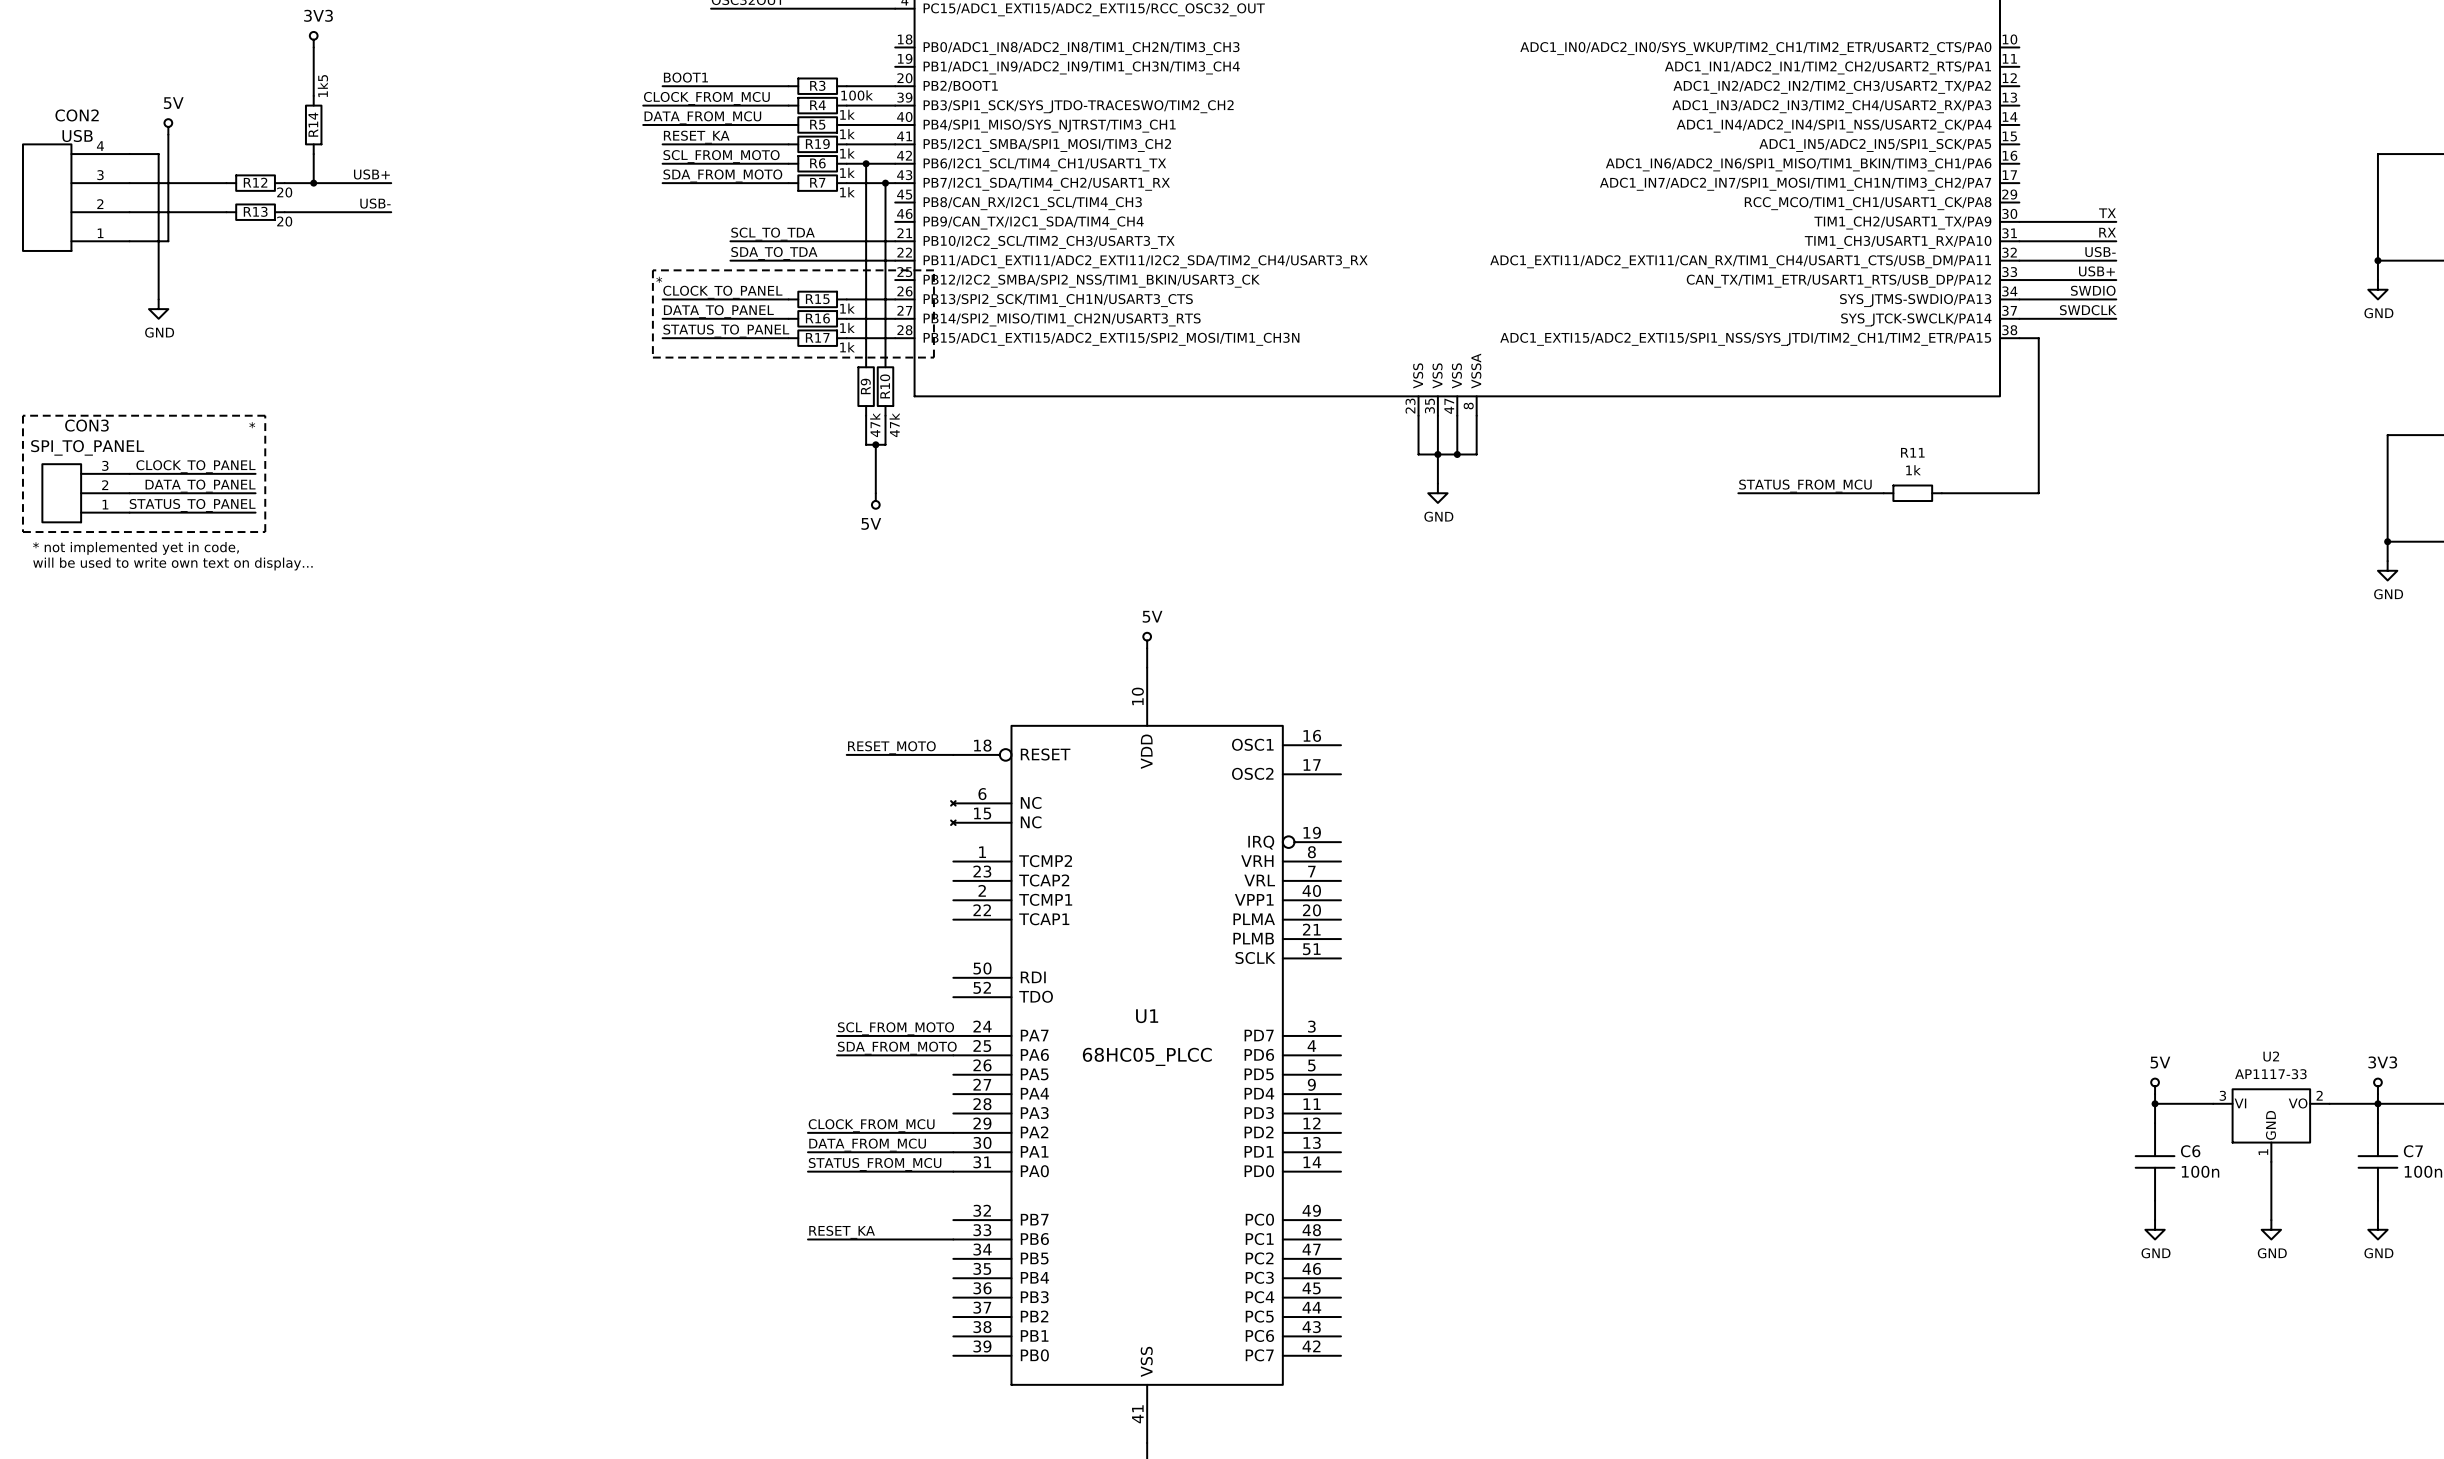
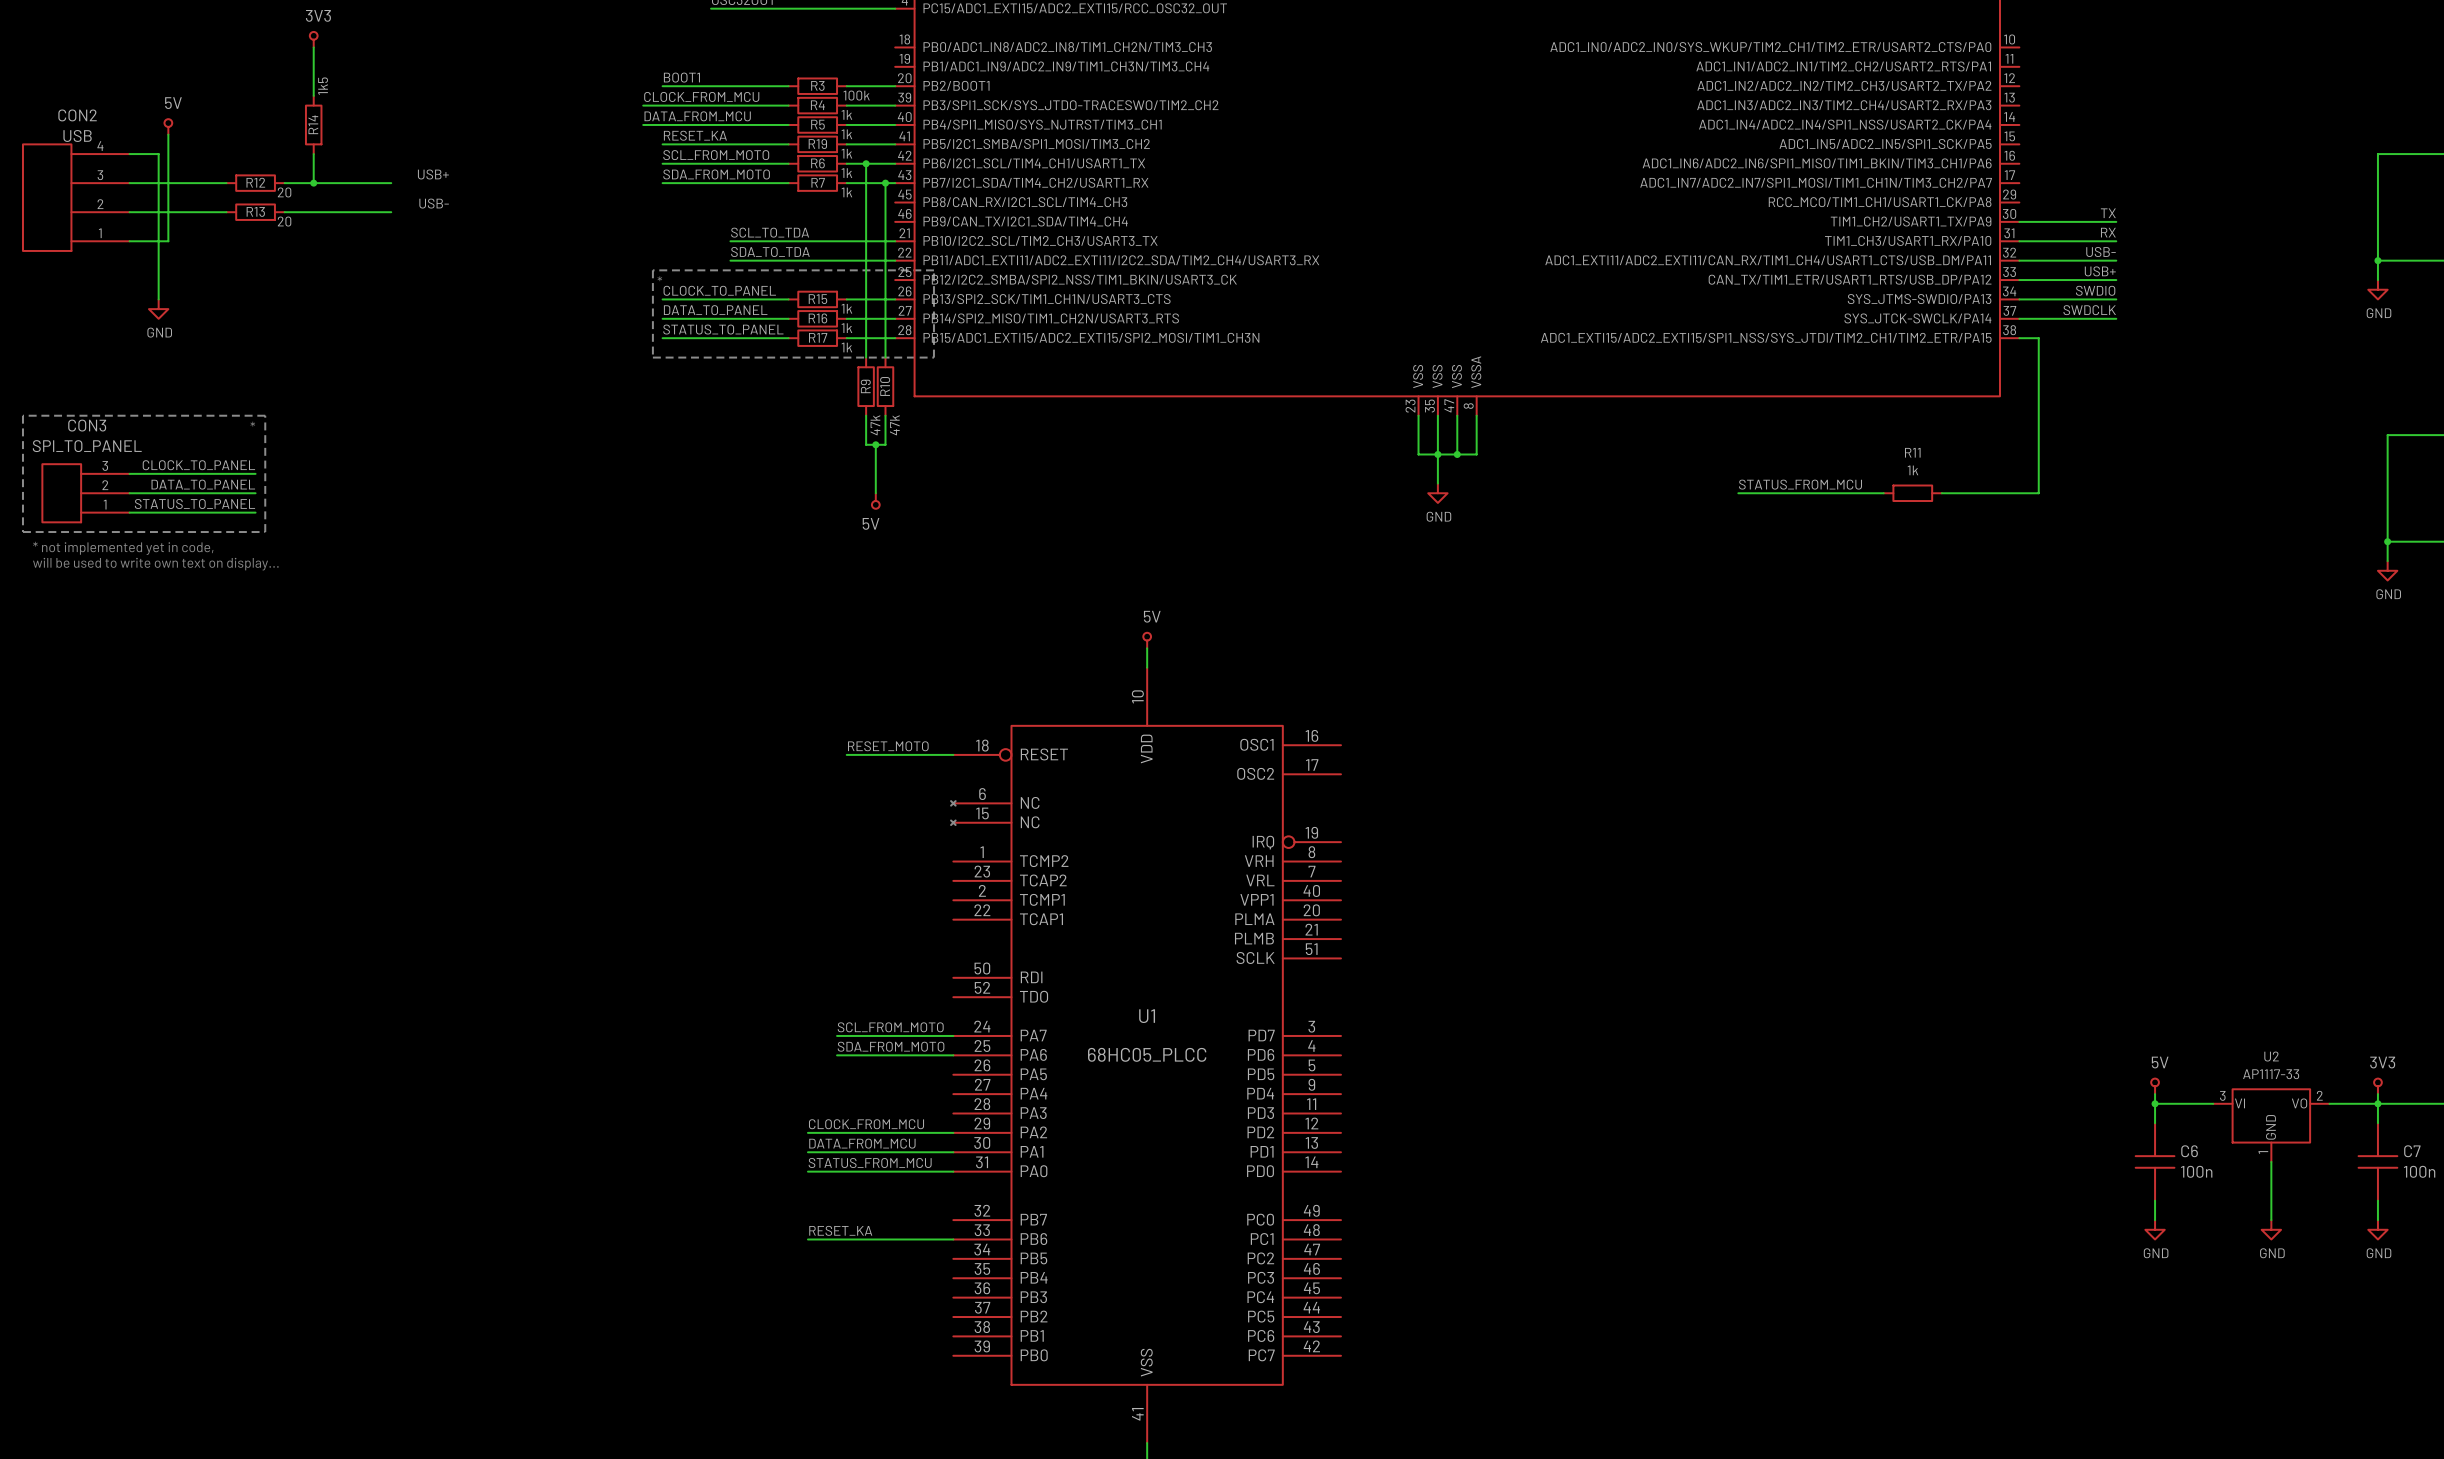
label position: USB+ (371, 174) -> USB+ (433, 174)
label position: USB- (375, 203) -> USB- (434, 203)

